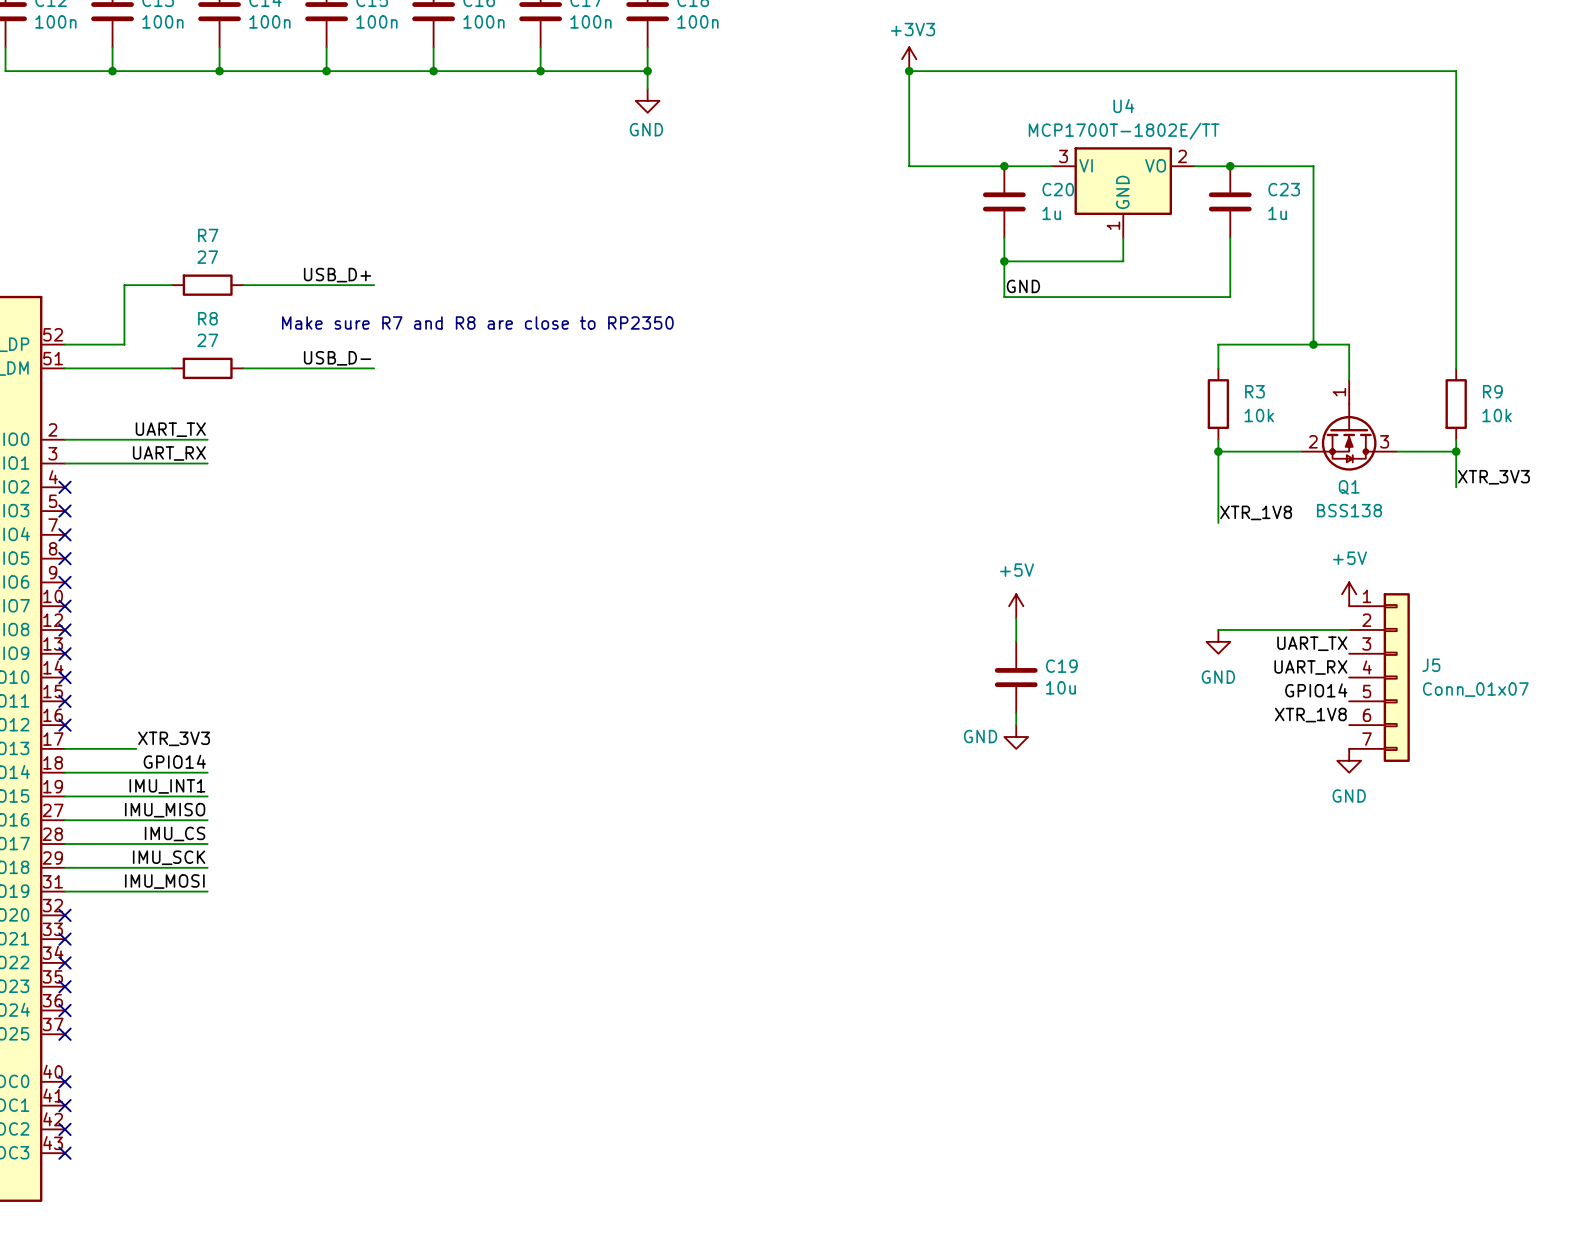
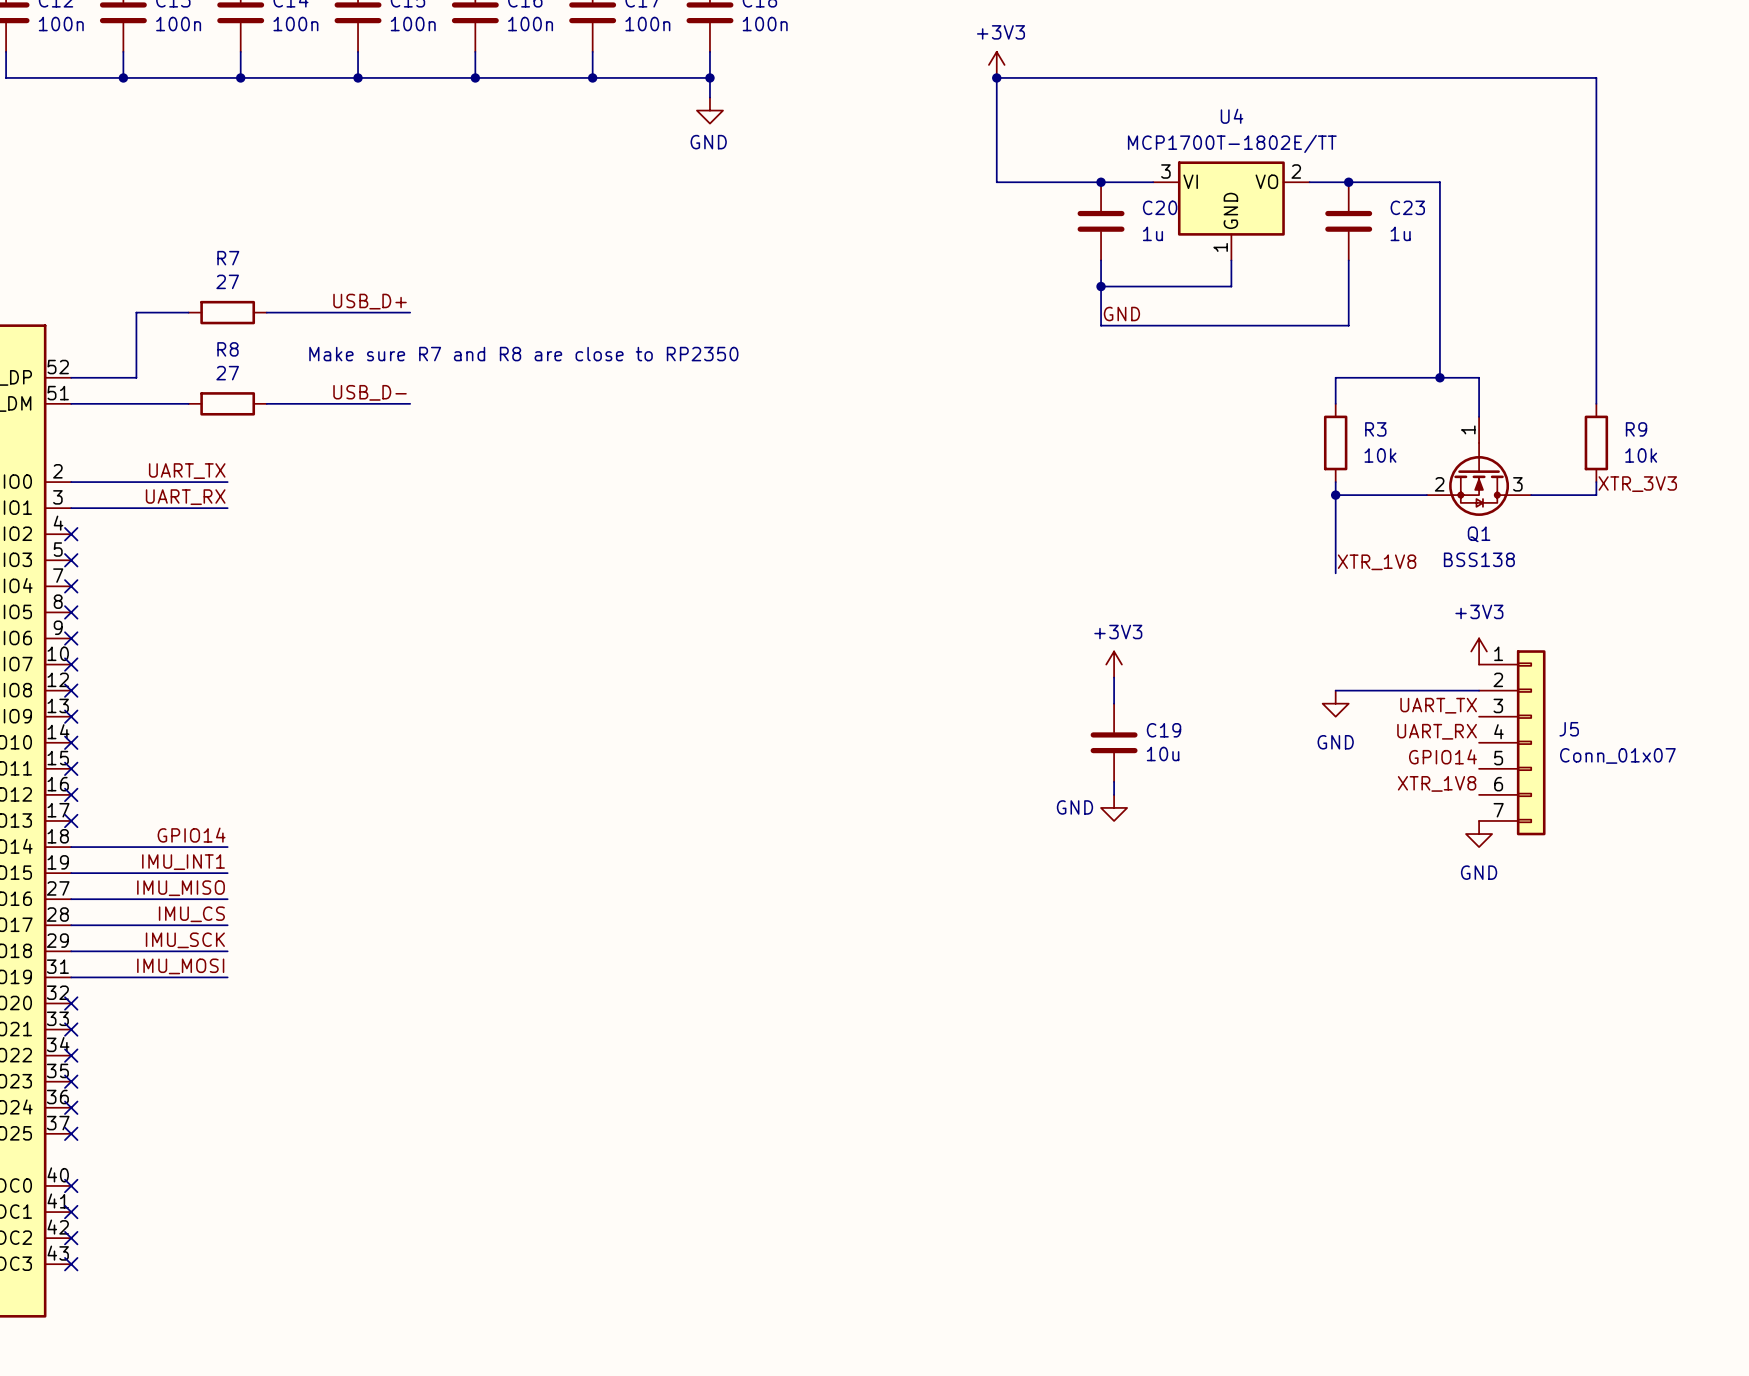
wire: (1456, 451) (1456, 487) -> none
junction: (1456, 451) -> none
label position: XTR_3V3 (1493, 477) -> XTR_3V3 (1637, 484)
power symbol: +5V (1349, 594) -> +3V3 (1479, 651)
power symbol: +5V (1016, 606) -> +3V3 (1114, 664)
label: XTR_3V3 (174, 738) -> none
wire: (64, 748) (136, 748) -> none
no-connect mark: none -> (71, 820)

